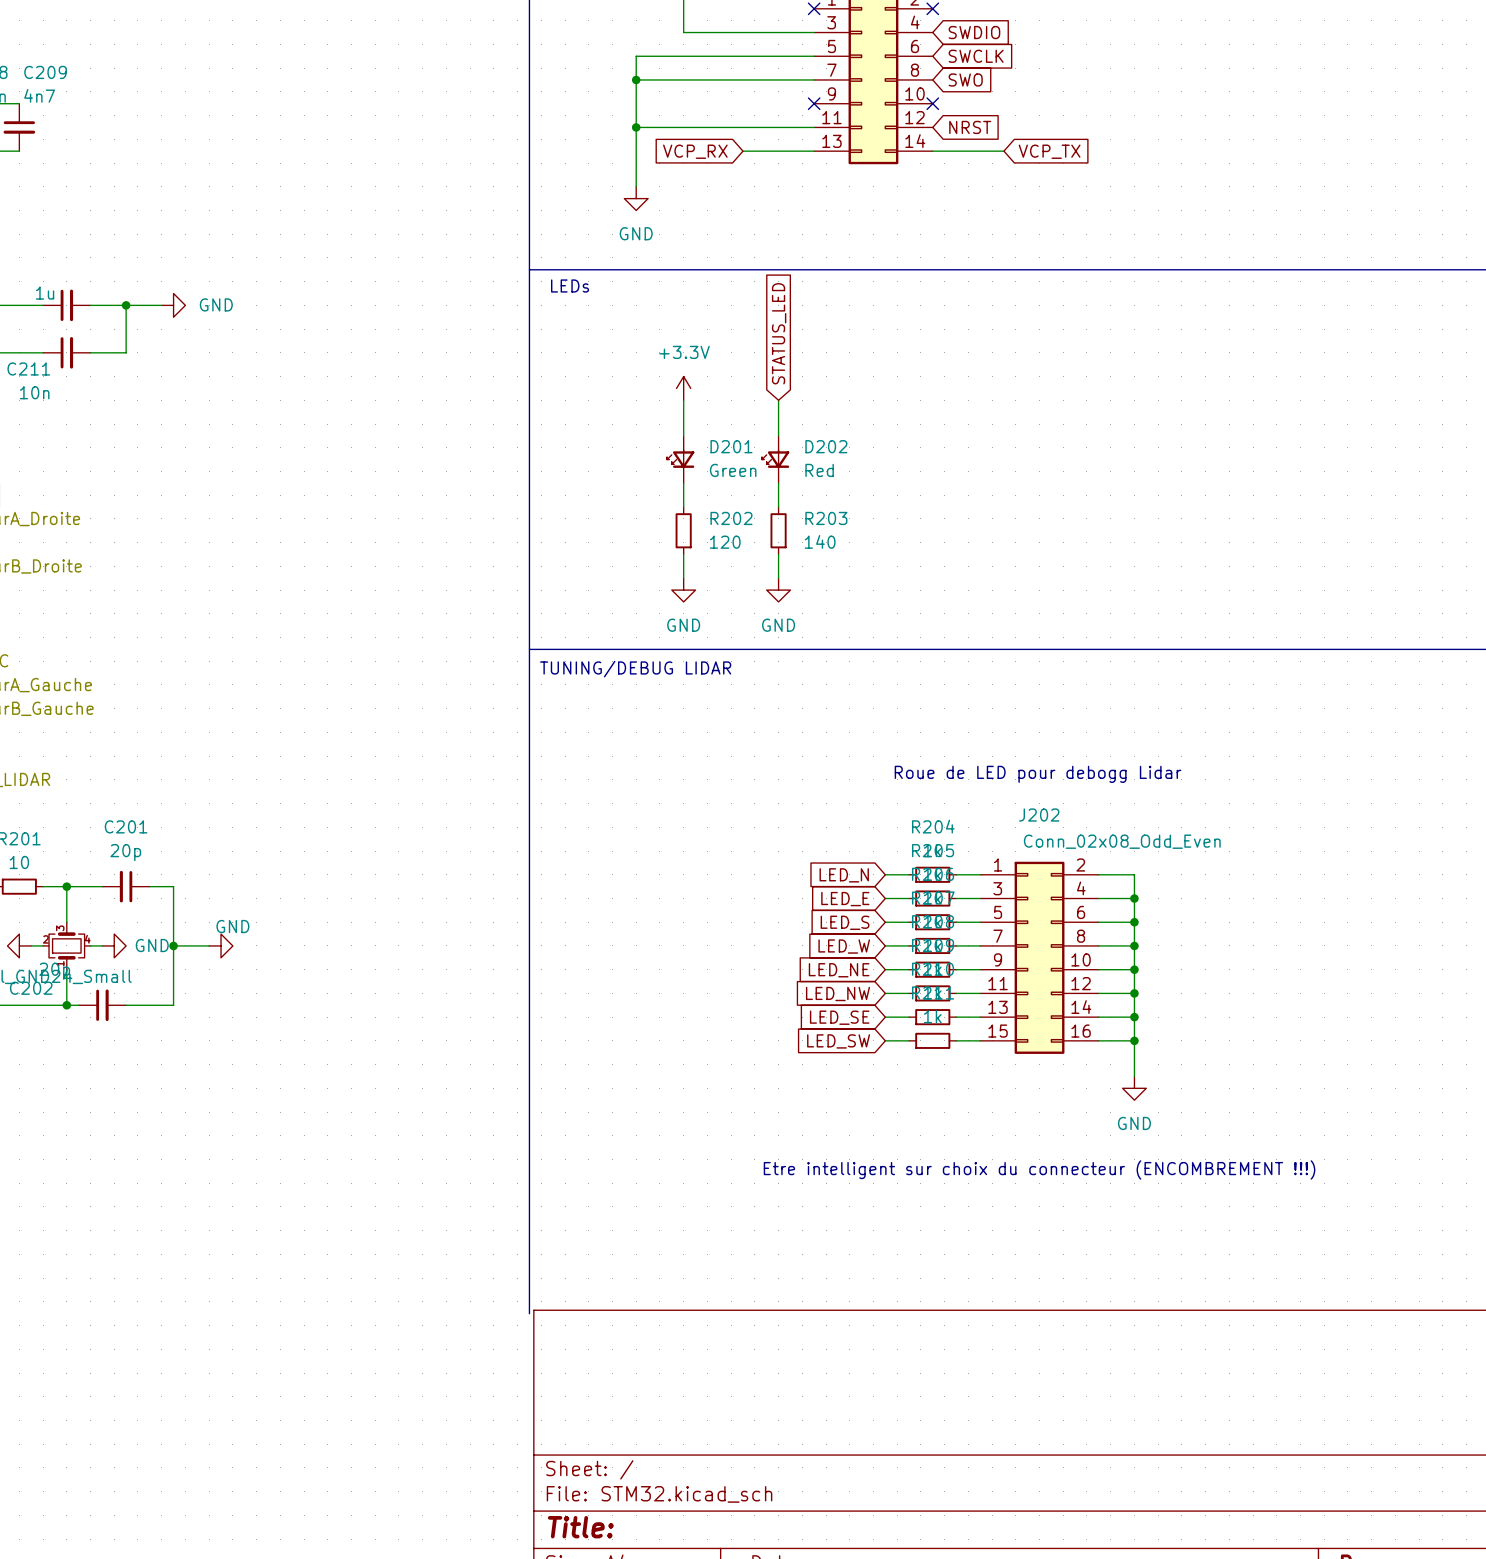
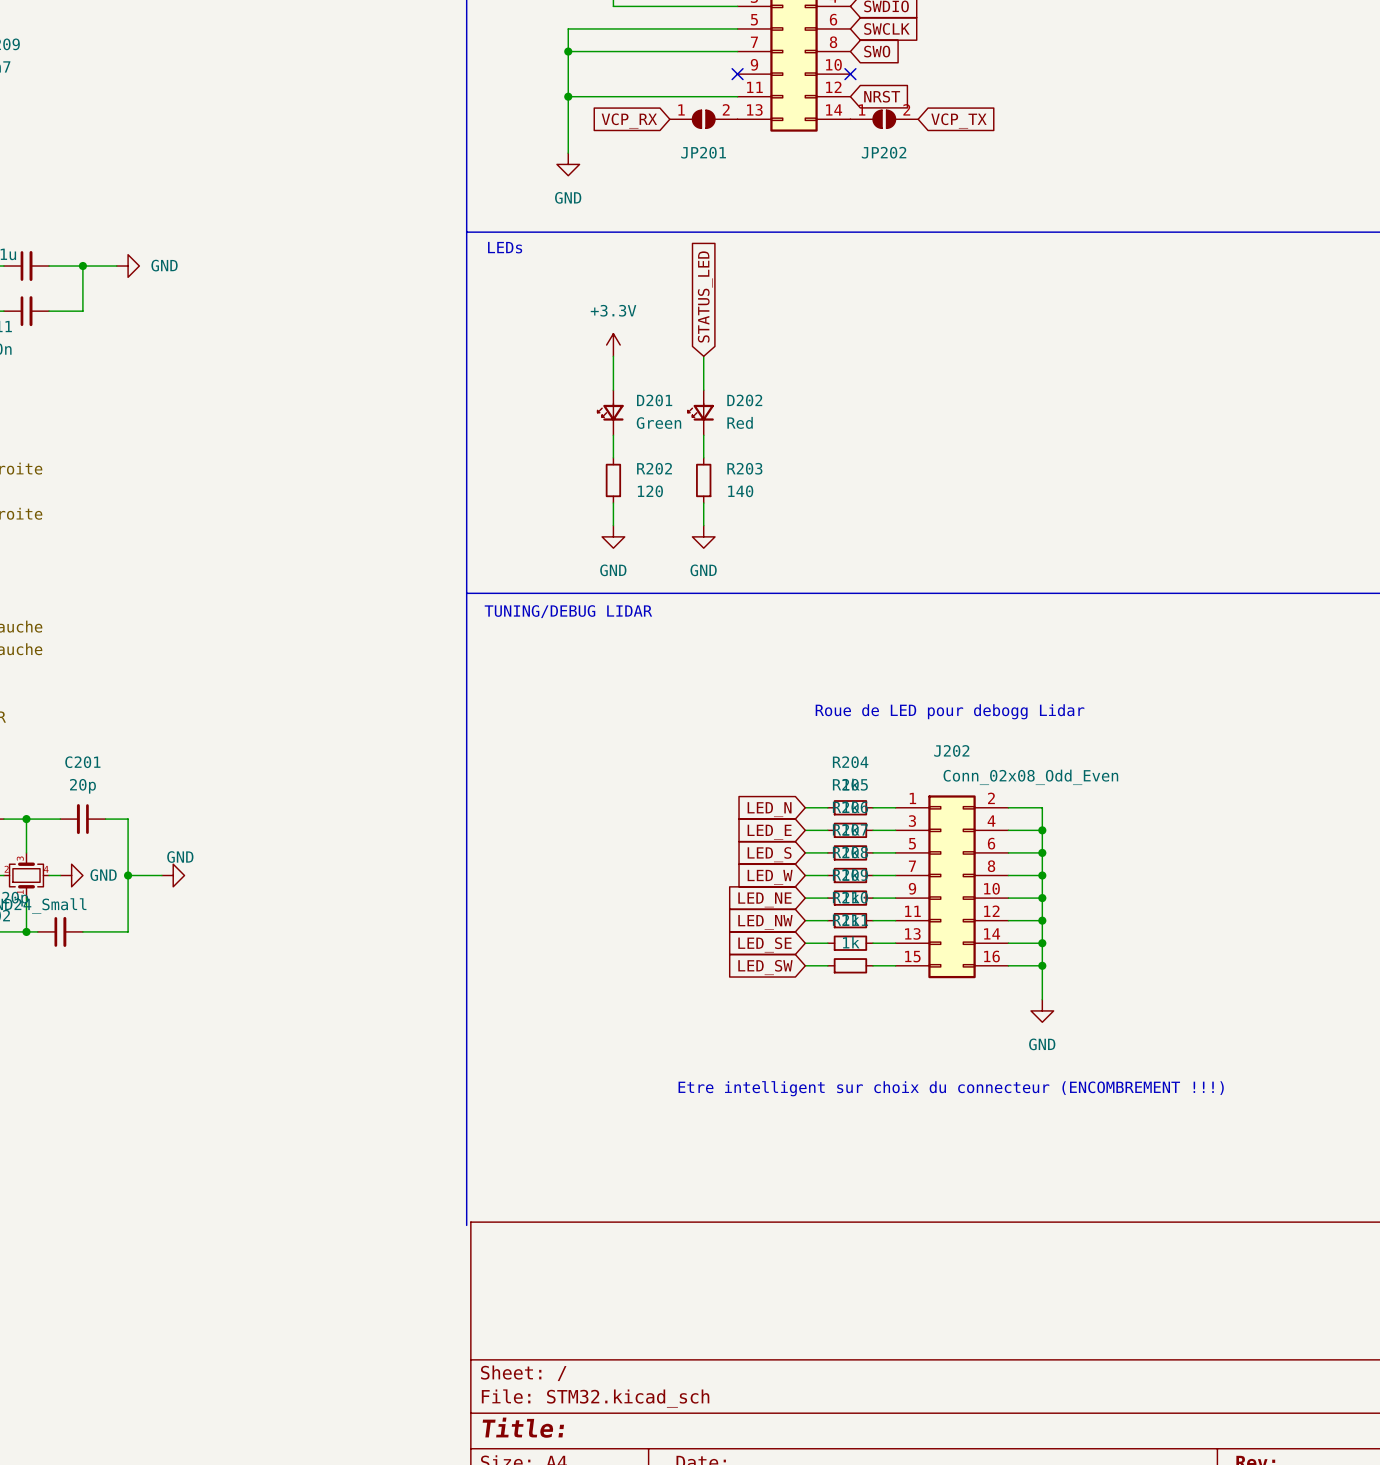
JP201: none -> (703, 119)
JP202: none -> (884, 119)

